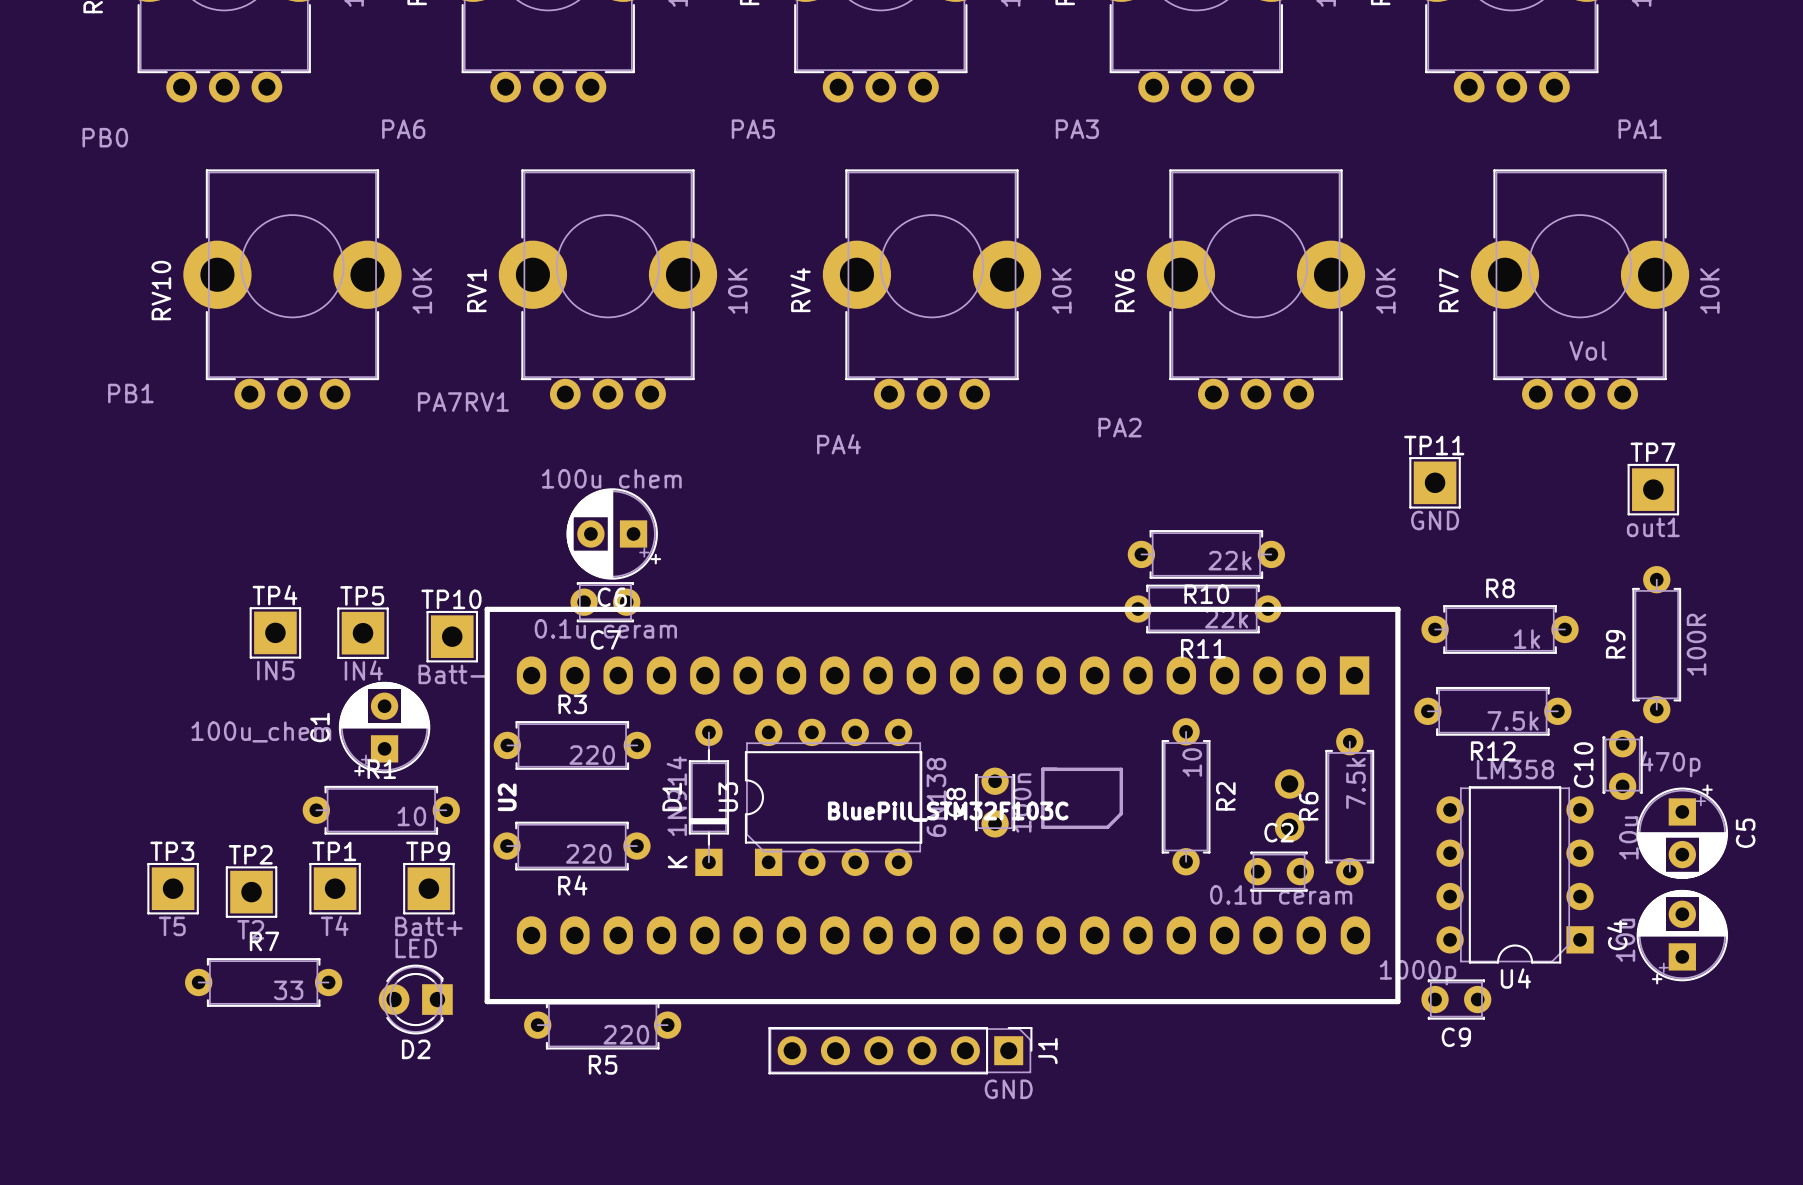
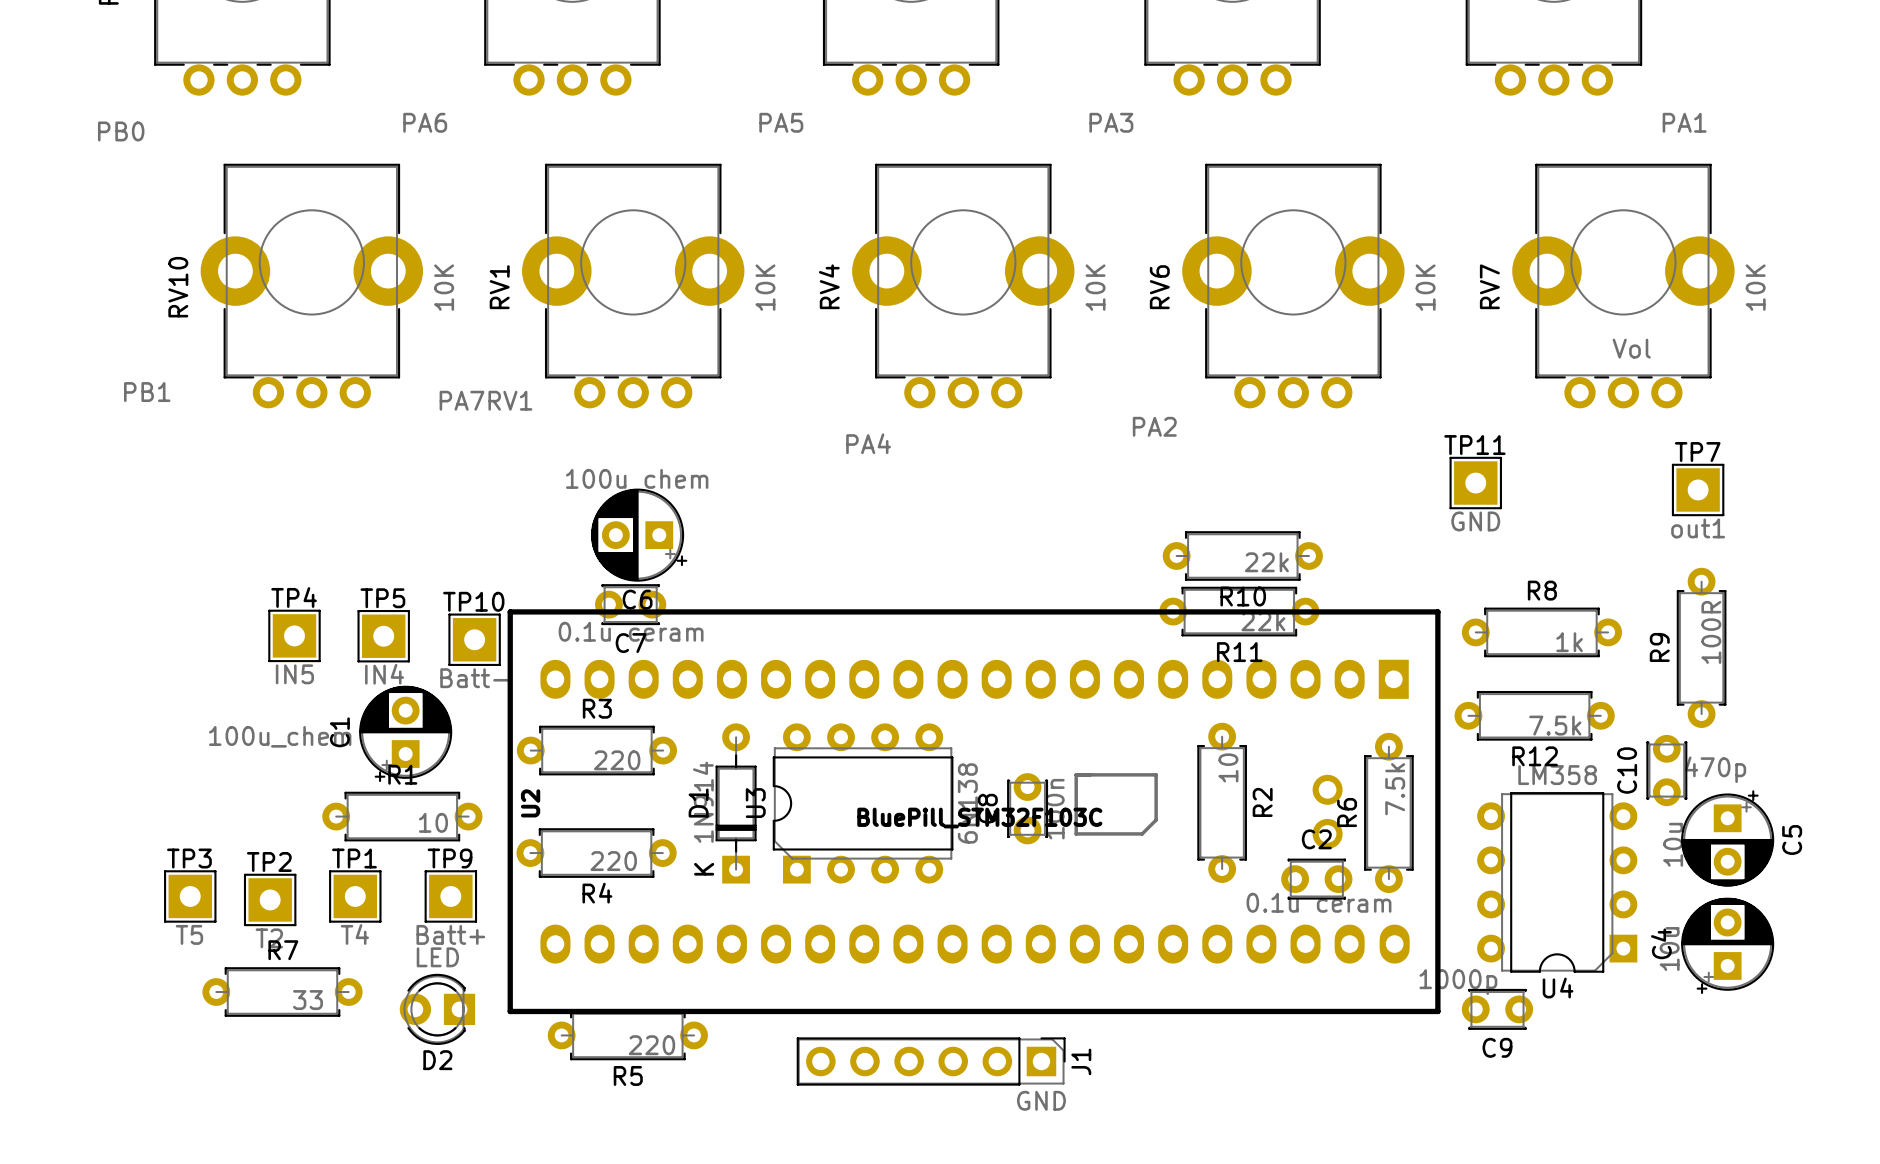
R9 value position: 100R (1696, 644) -> 100R (1711, 632)

